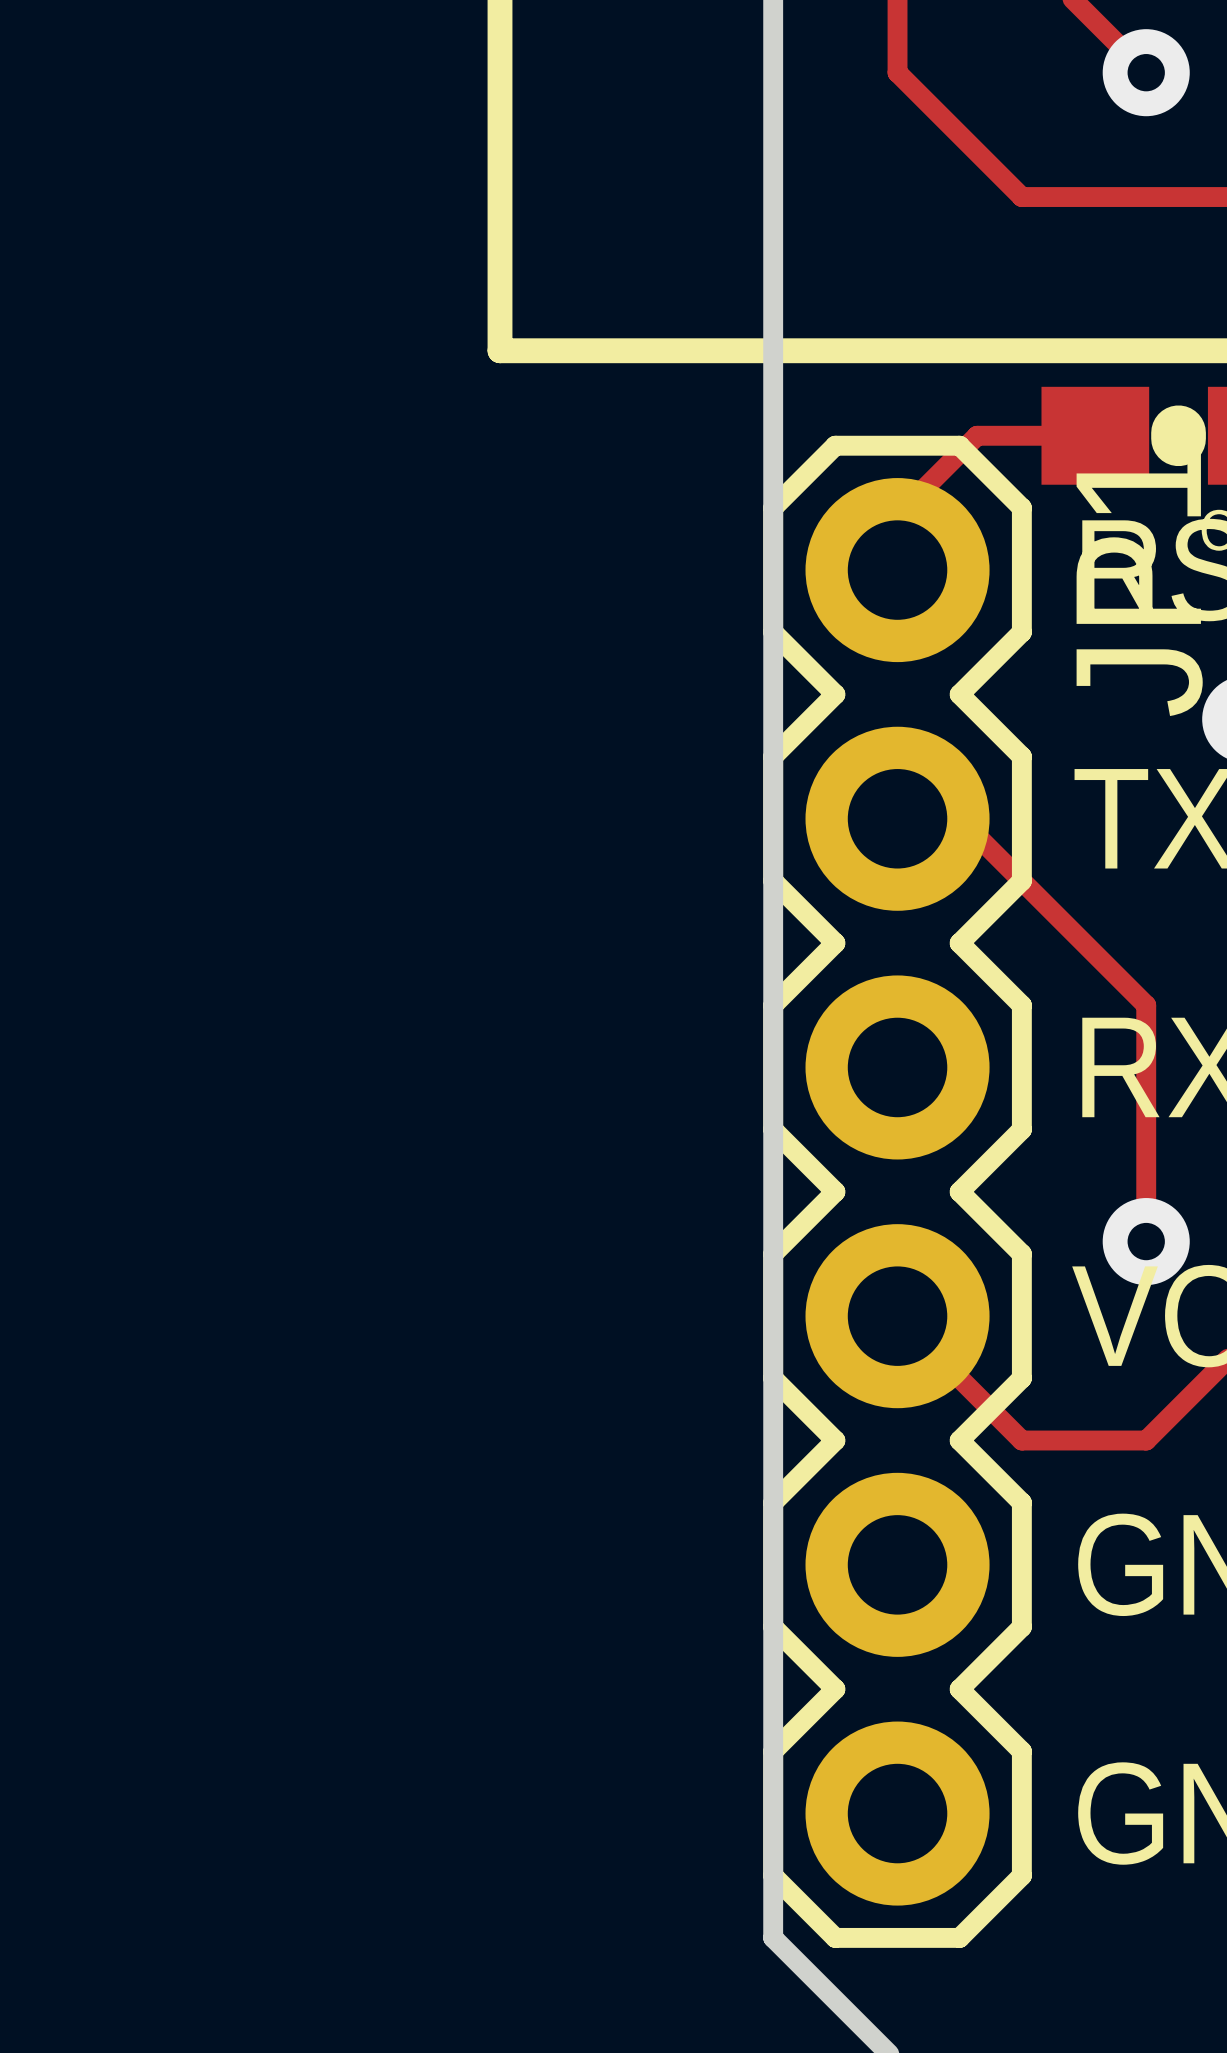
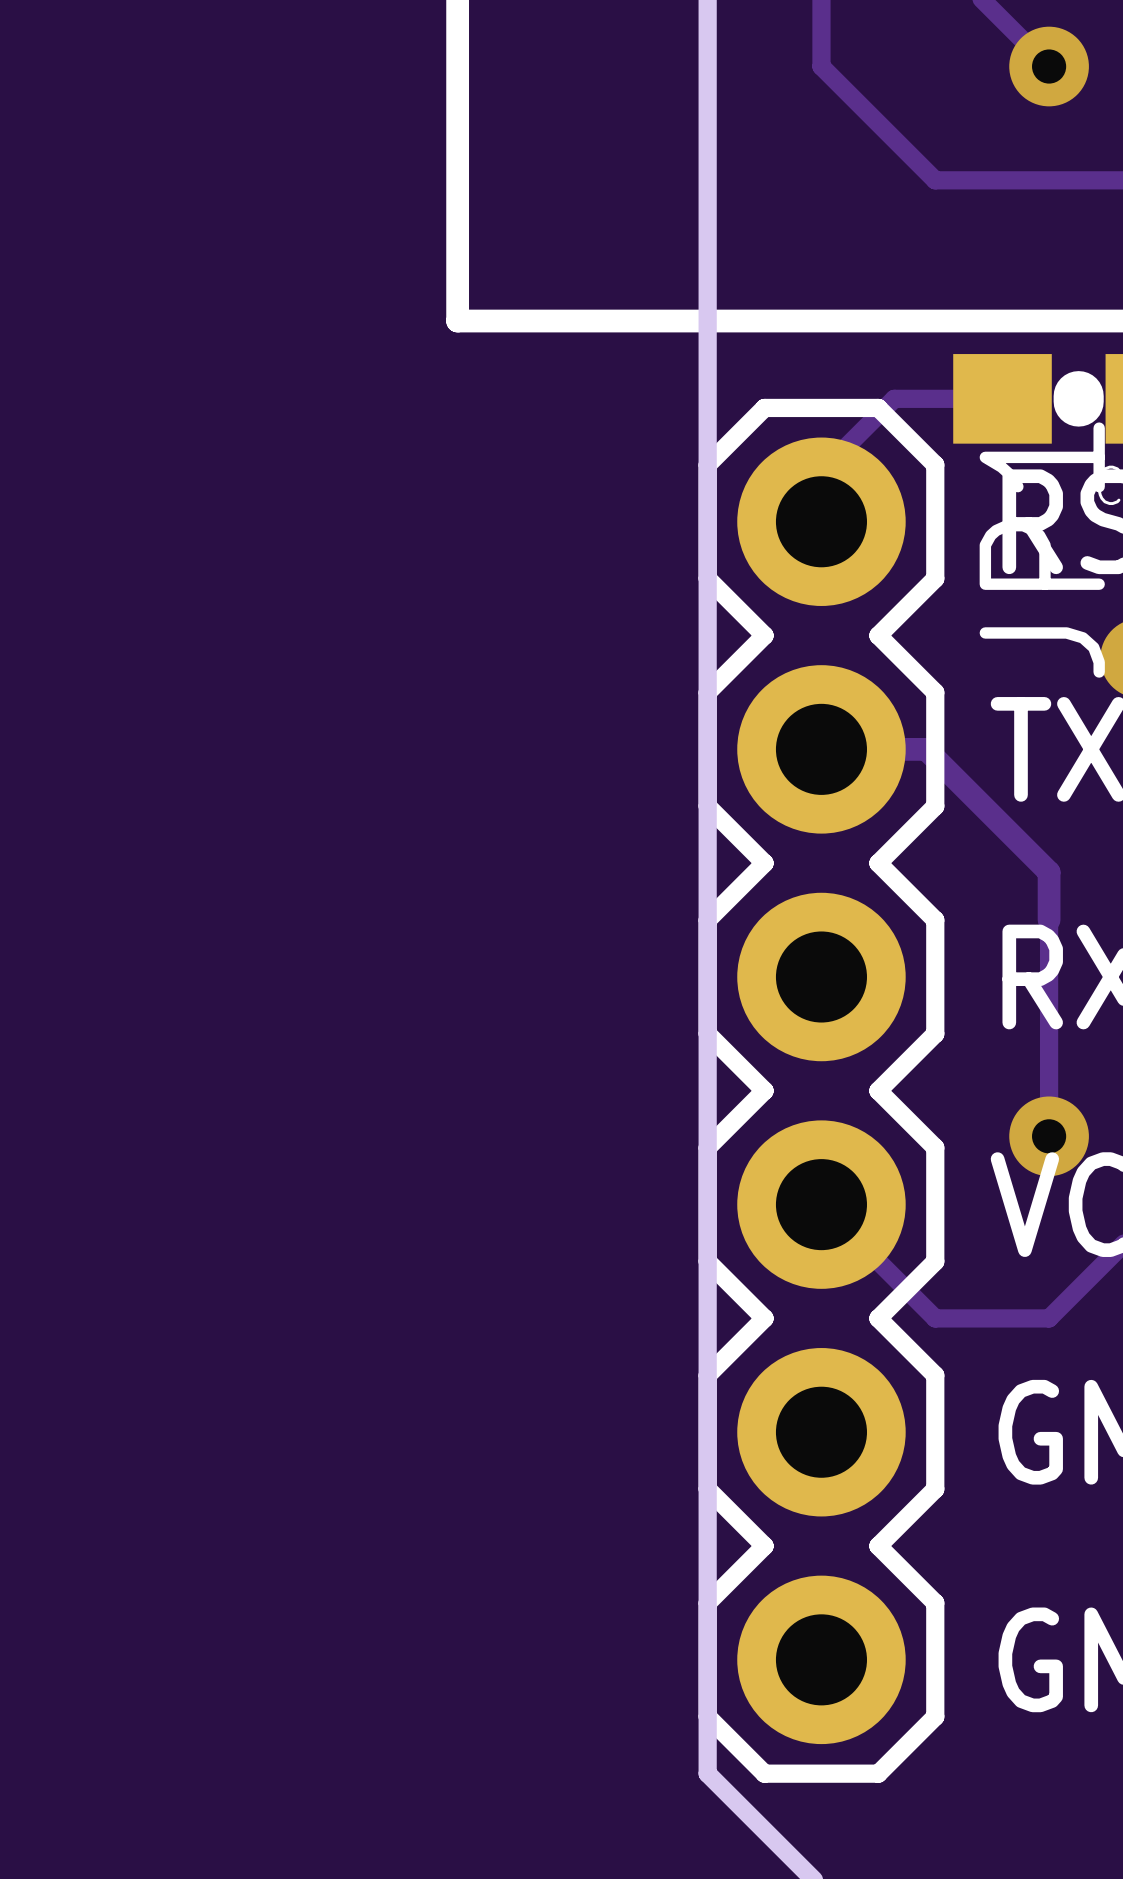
track: (959, 818) (1146, 1005) -> (878, 749) (926, 749) (1049, 872) (1049, 920)

